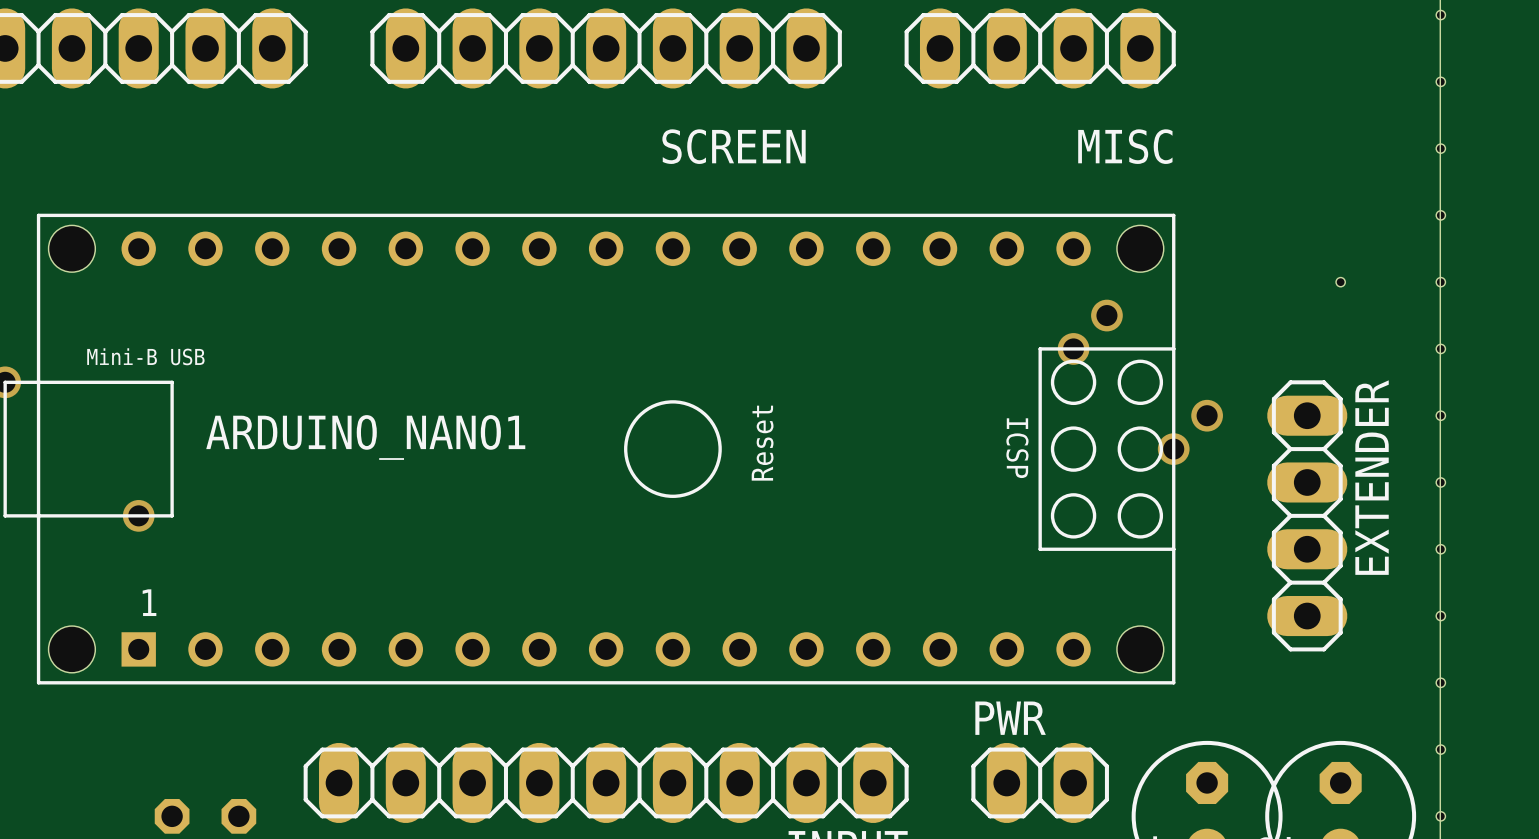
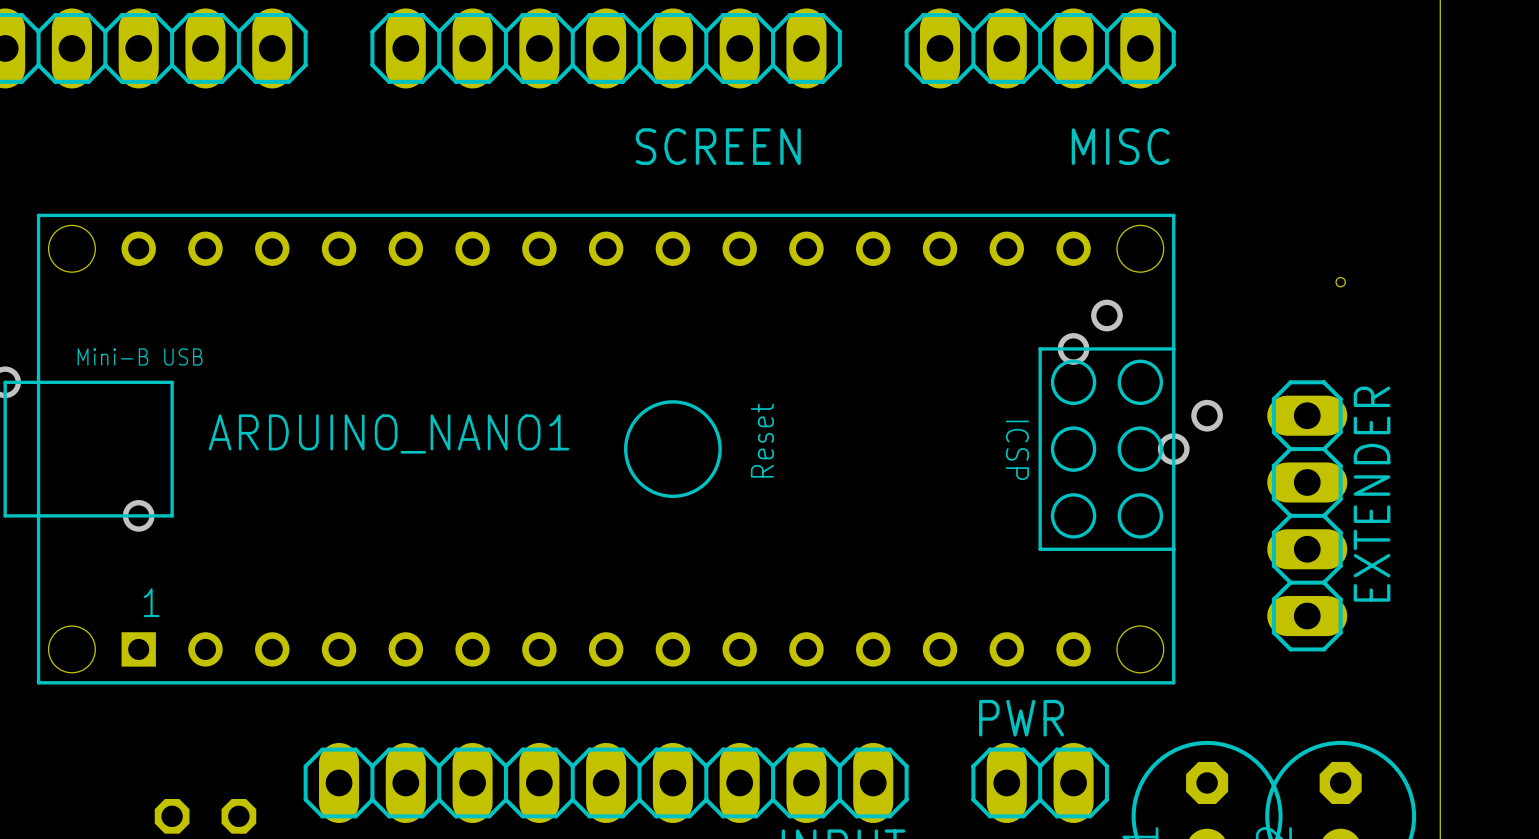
hole: (1440, 15) -> none
hole: (1440, 81) -> none
hole: (1440, 148) -> none
hole: (1440, 215) -> none
hole: (1440, 282) -> none
hole: (1440, 348) -> none
hole: (1440, 415) -> none
hole: (1440, 482) -> none
hole: (1440, 549) -> none
hole: (1440, 616) -> none
hole: (1440, 682) -> none
hole: (1440, 749) -> none
hole: (1440, 816) -> none

